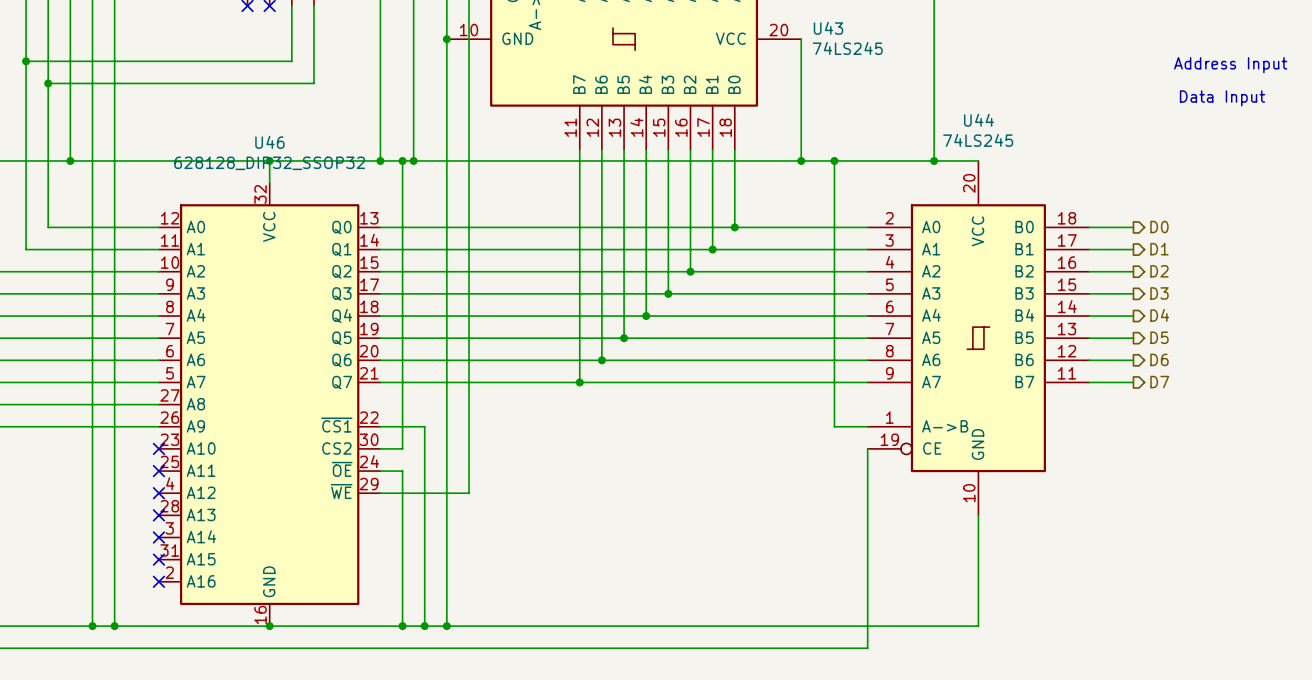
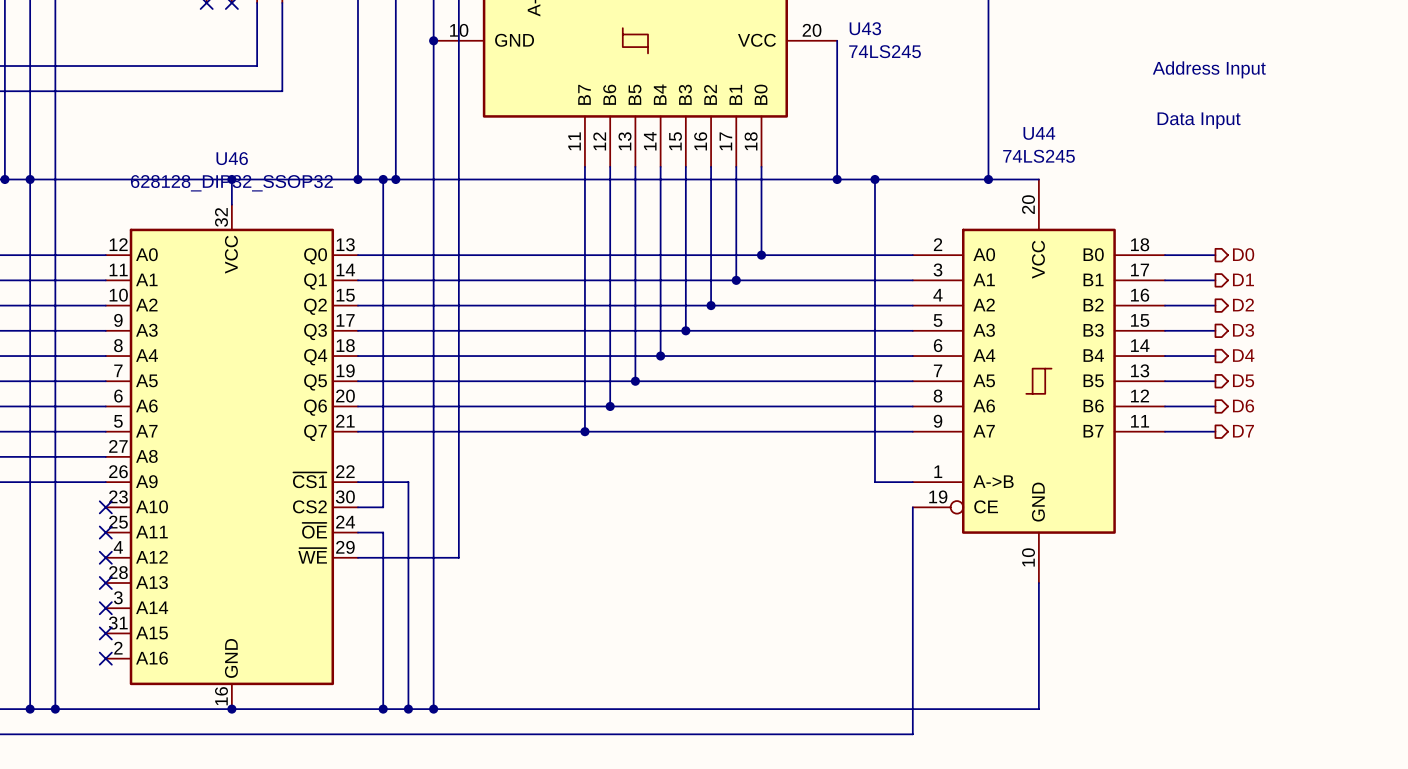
text position: Address Input (1230, 65) -> Address Input (1209, 69)
text position: Data Input (1222, 98) -> Data Input (1199, 120)
junction: none -> (30, 179)

